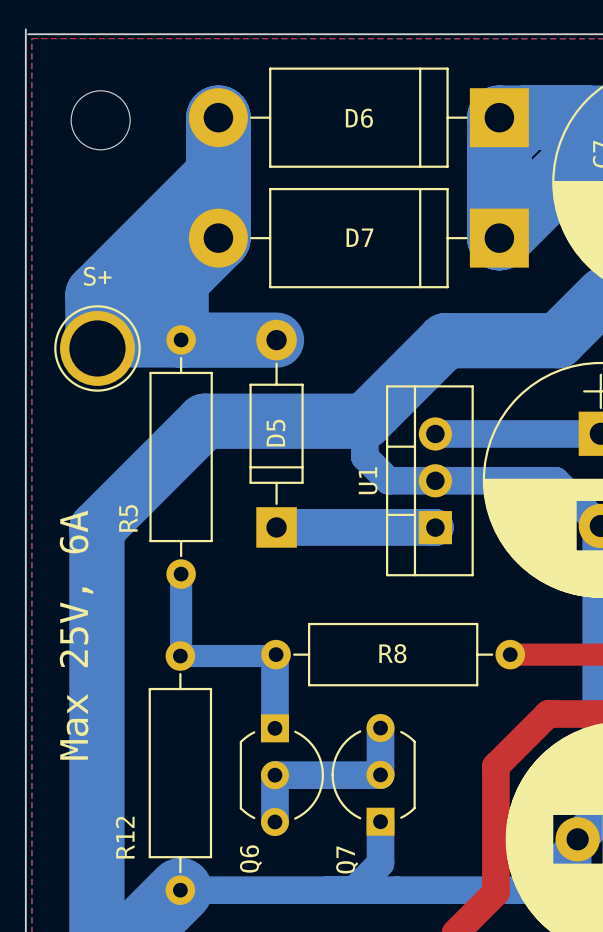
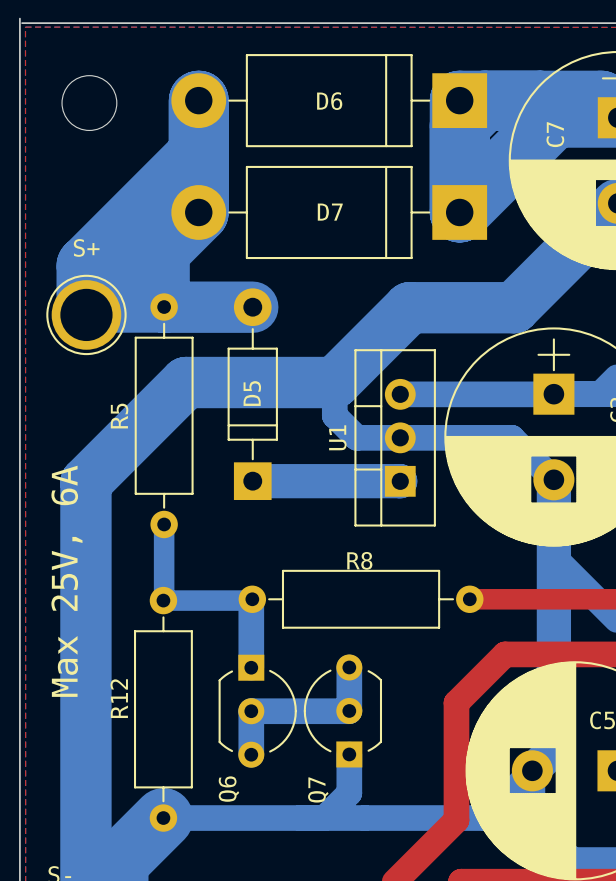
R5 name position: R5 (128, 518) -> R5 (119, 416)
R8 name position: R8 (392, 653) -> R8 (359, 560)
R12 name position: R12 (125, 837) -> R12 (119, 698)

